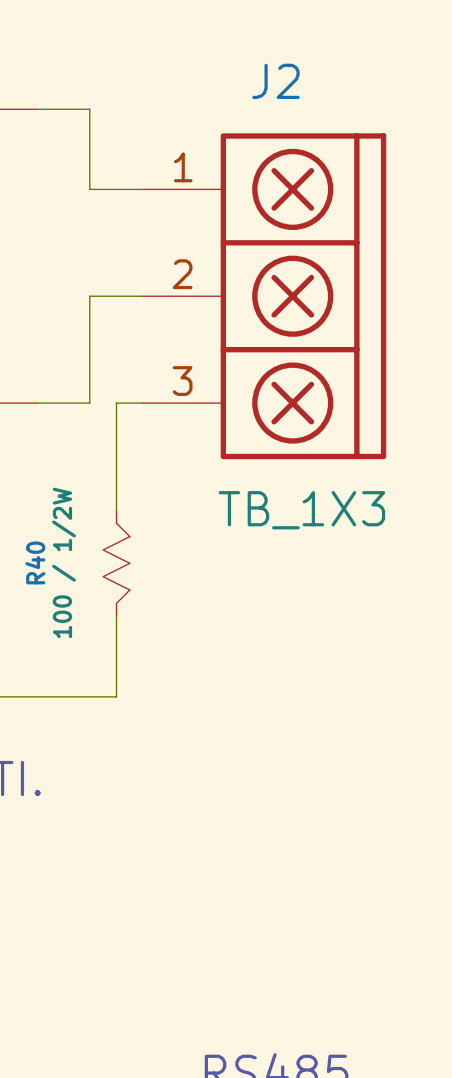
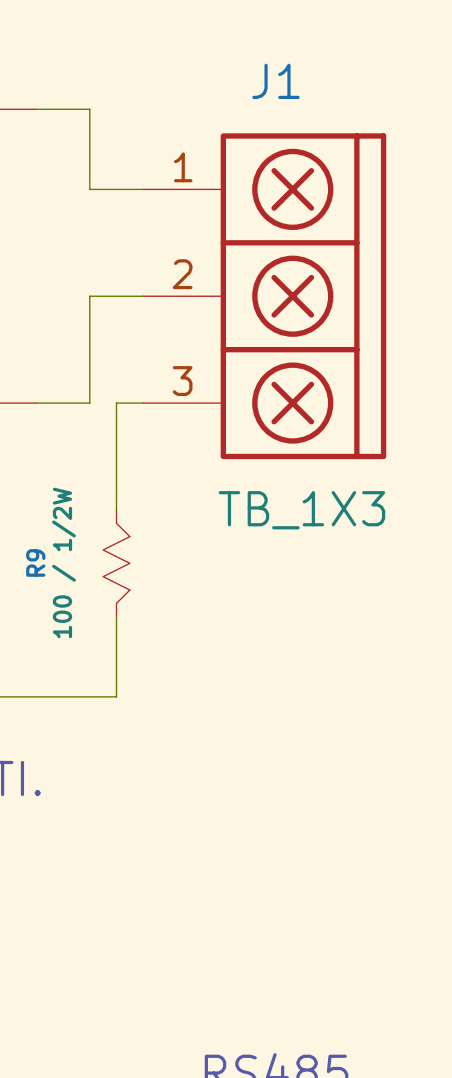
J2 name: J2 (275, 81) -> J1 (275, 81)
R40 name: R40 (35, 562) -> R9 (35, 562)

